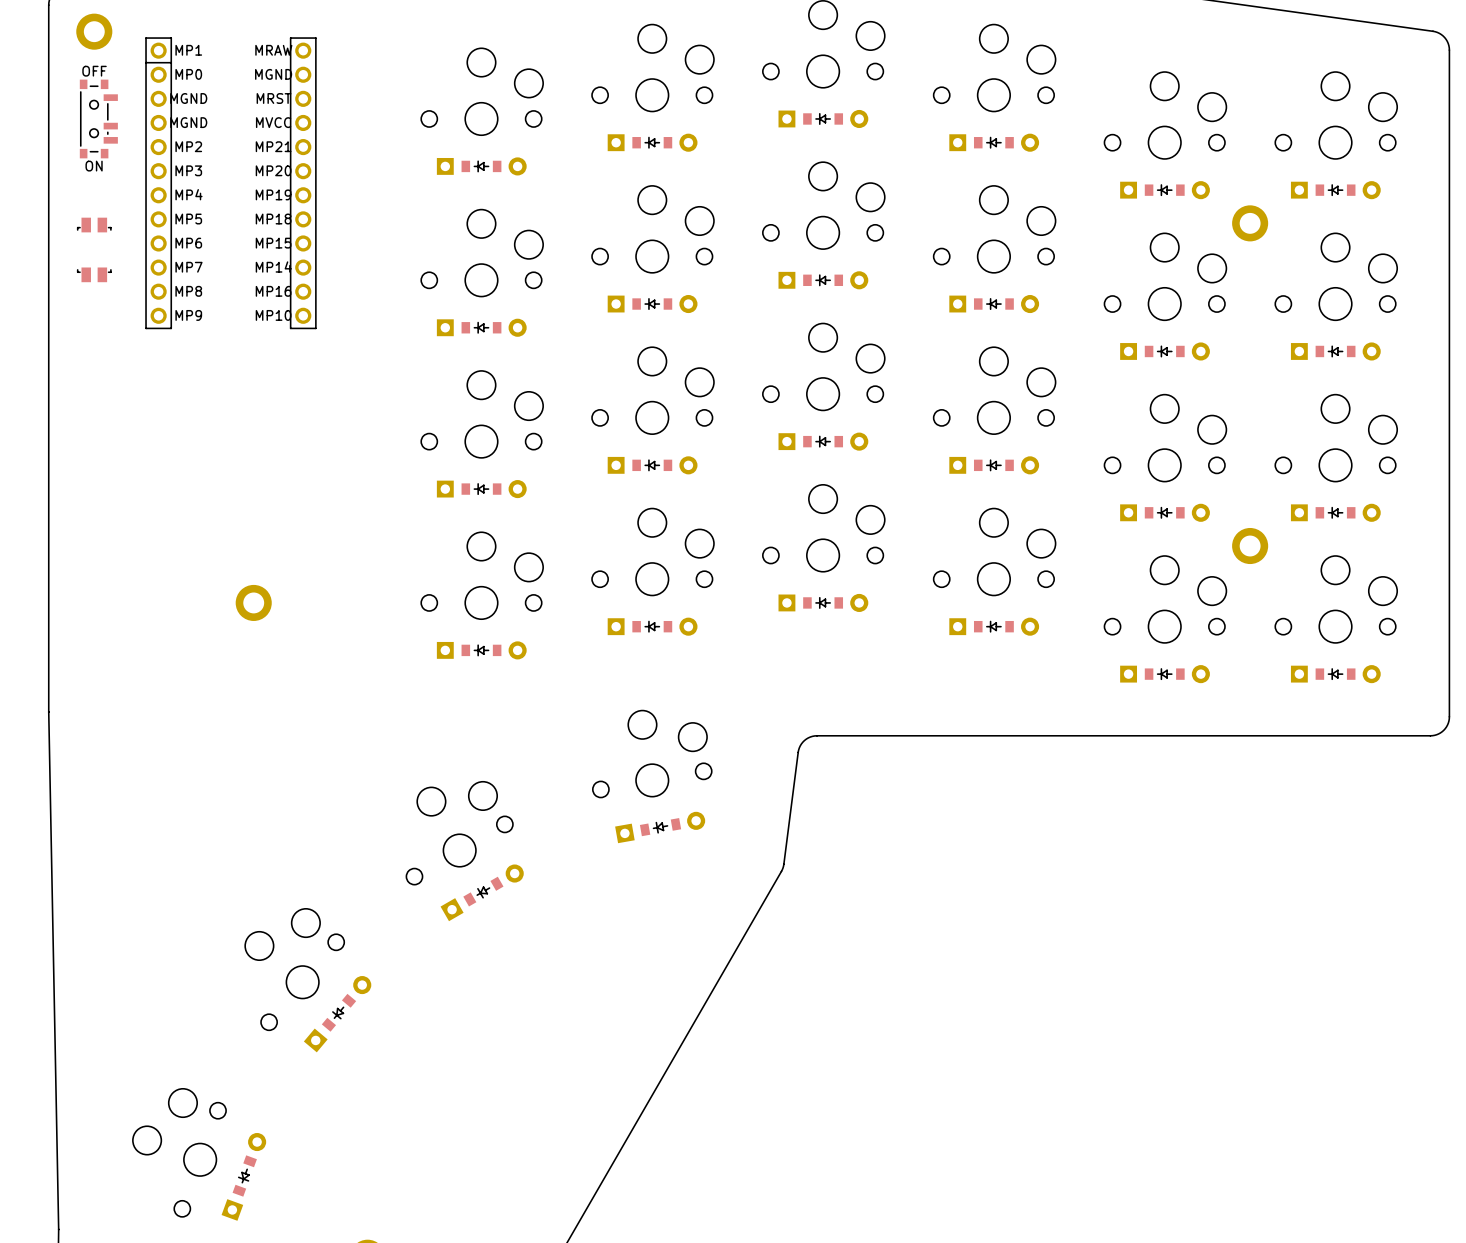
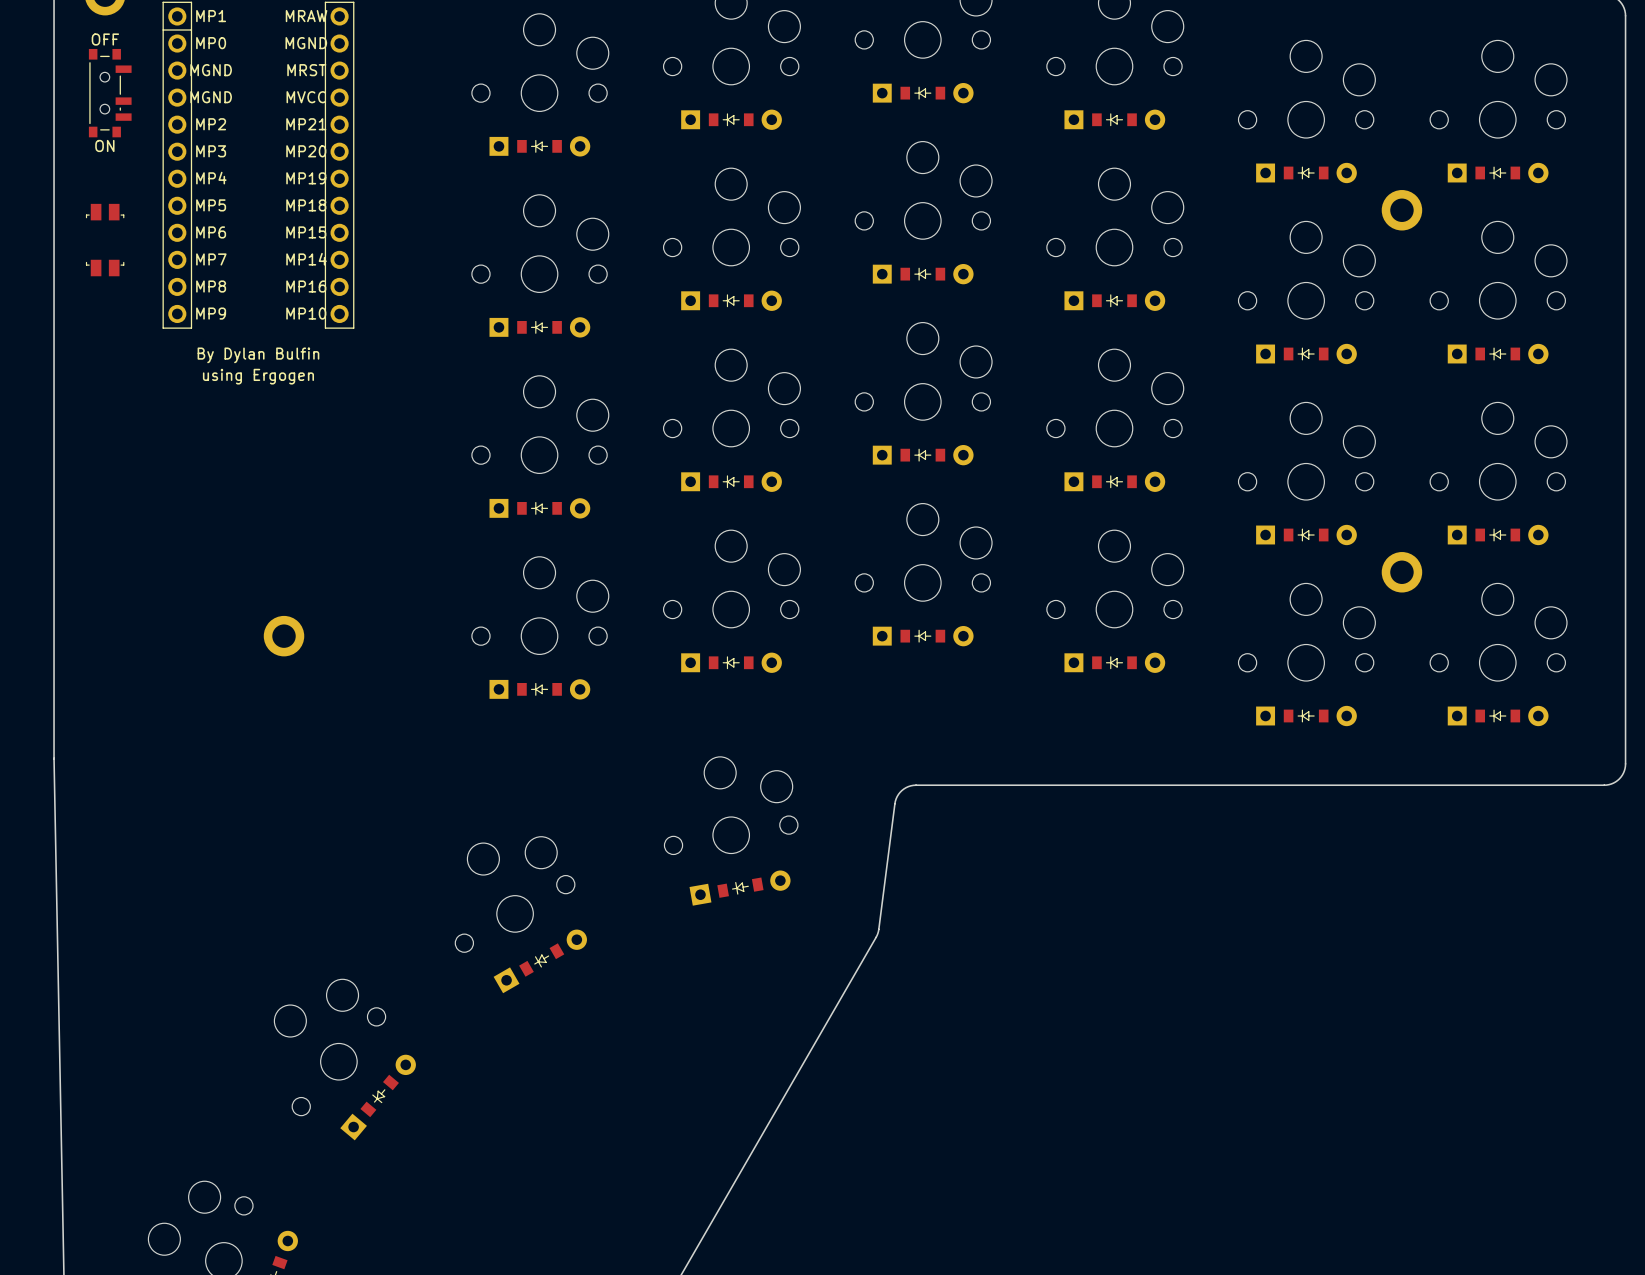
text: none -> By Dylan Bulfin (258, 355)
text: none -> using Ergogen (258, 376)

